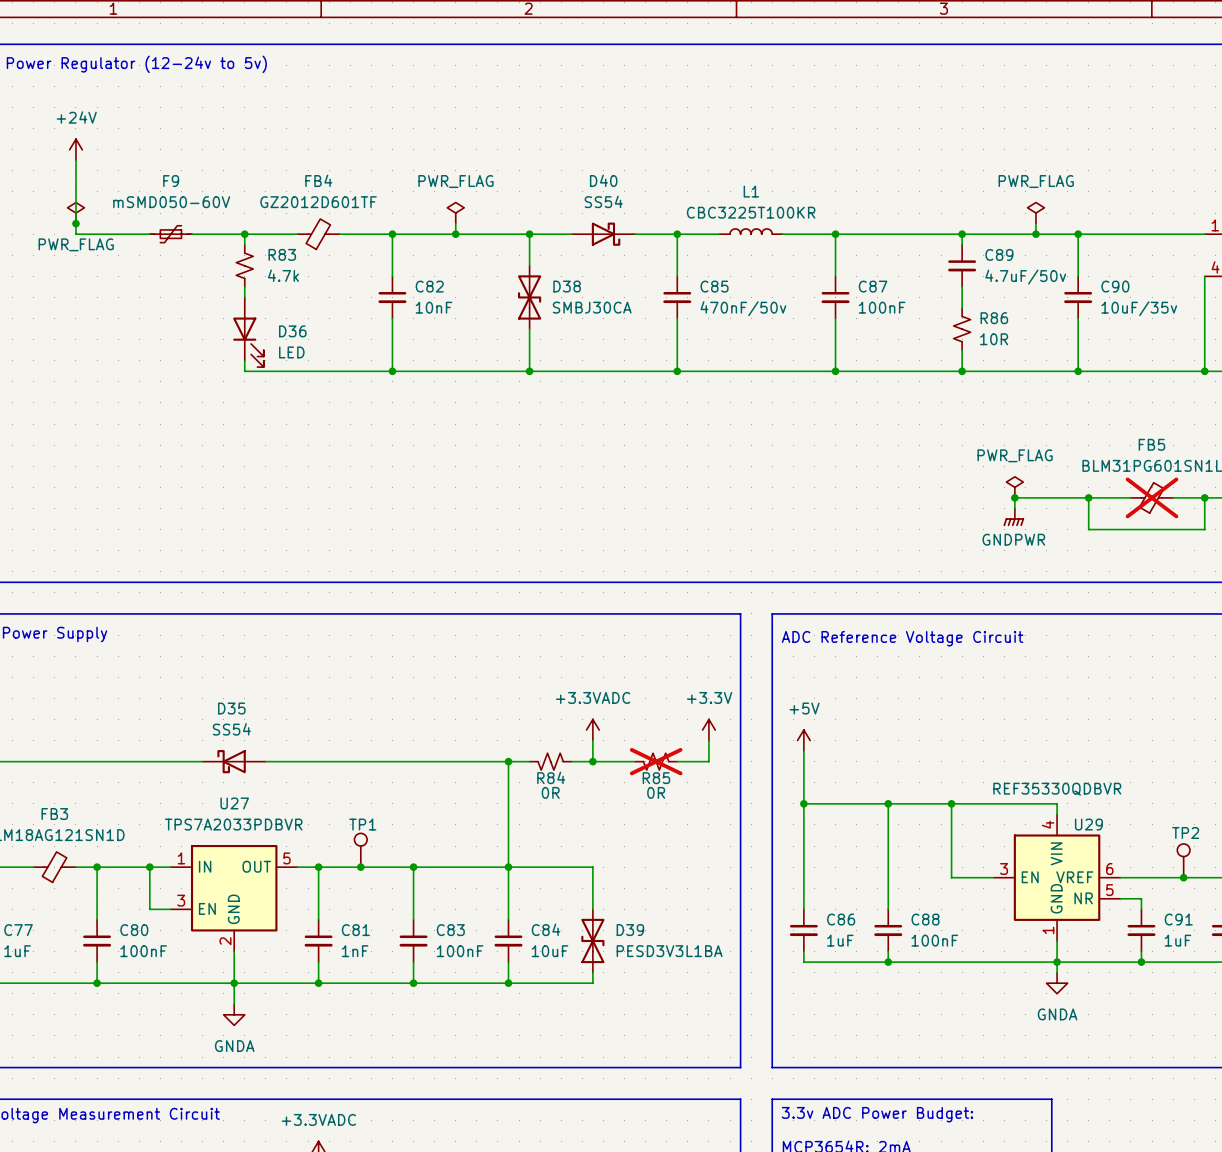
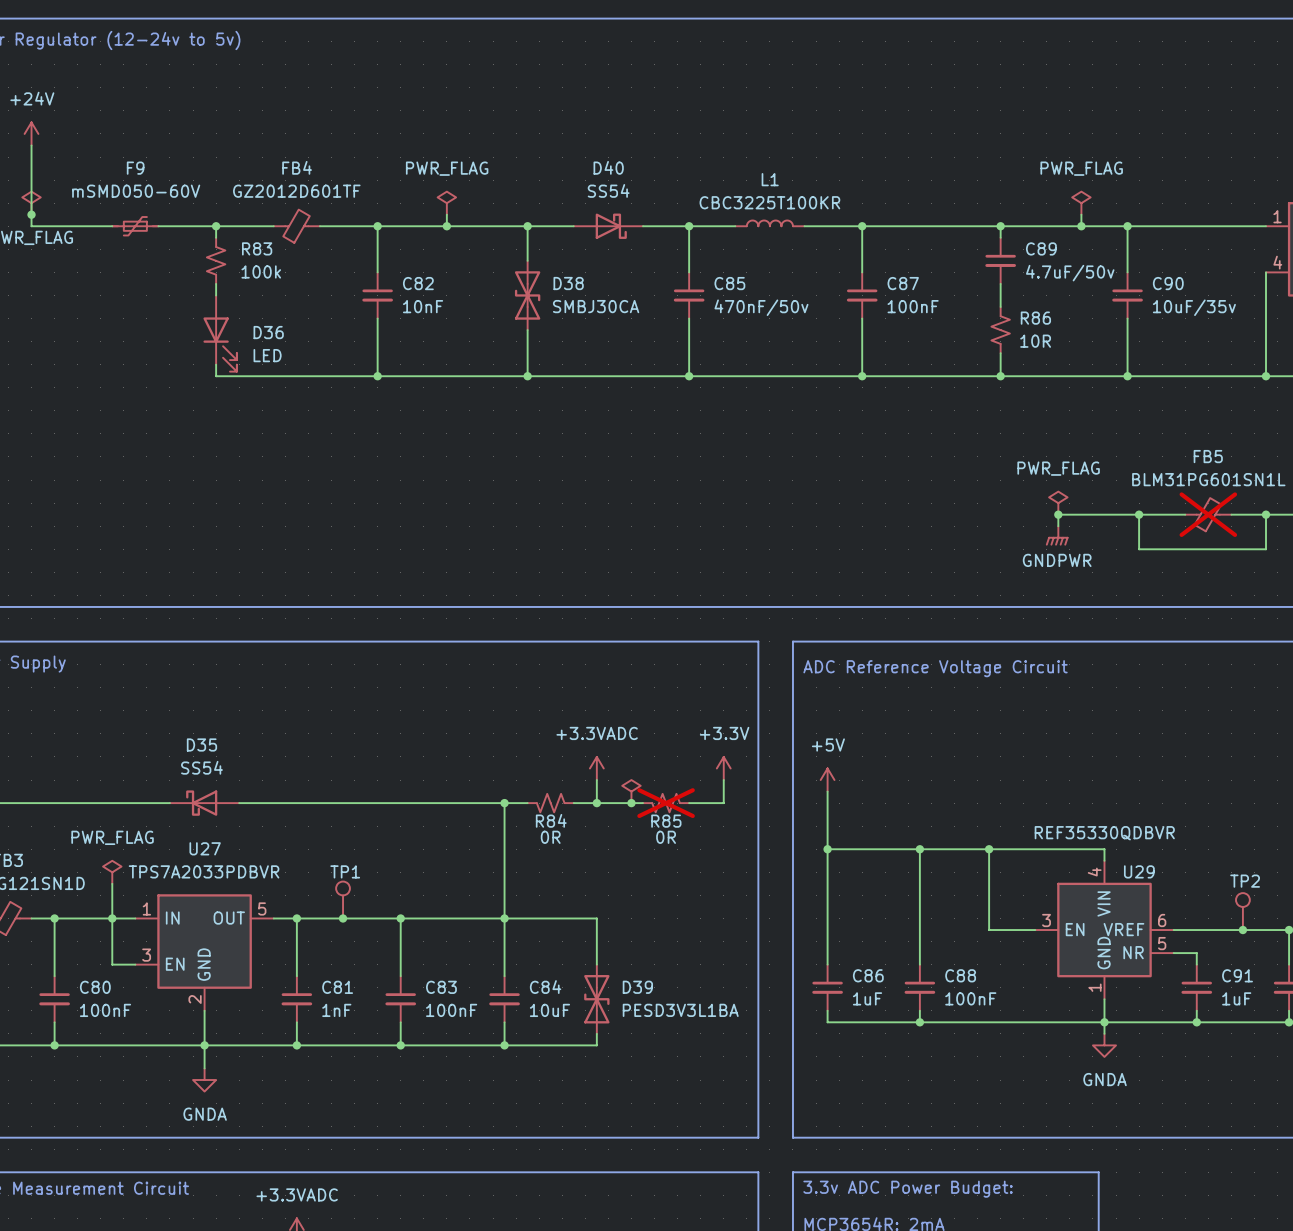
R83 value: 4.7k (283, 275) -> 100k (261, 271)
power symbol: none -> (631, 791)
junction: none -> (631, 803)
power symbol: none -> PWR_FLAG (112, 872)
wire: none -> (112, 883) (112, 918)

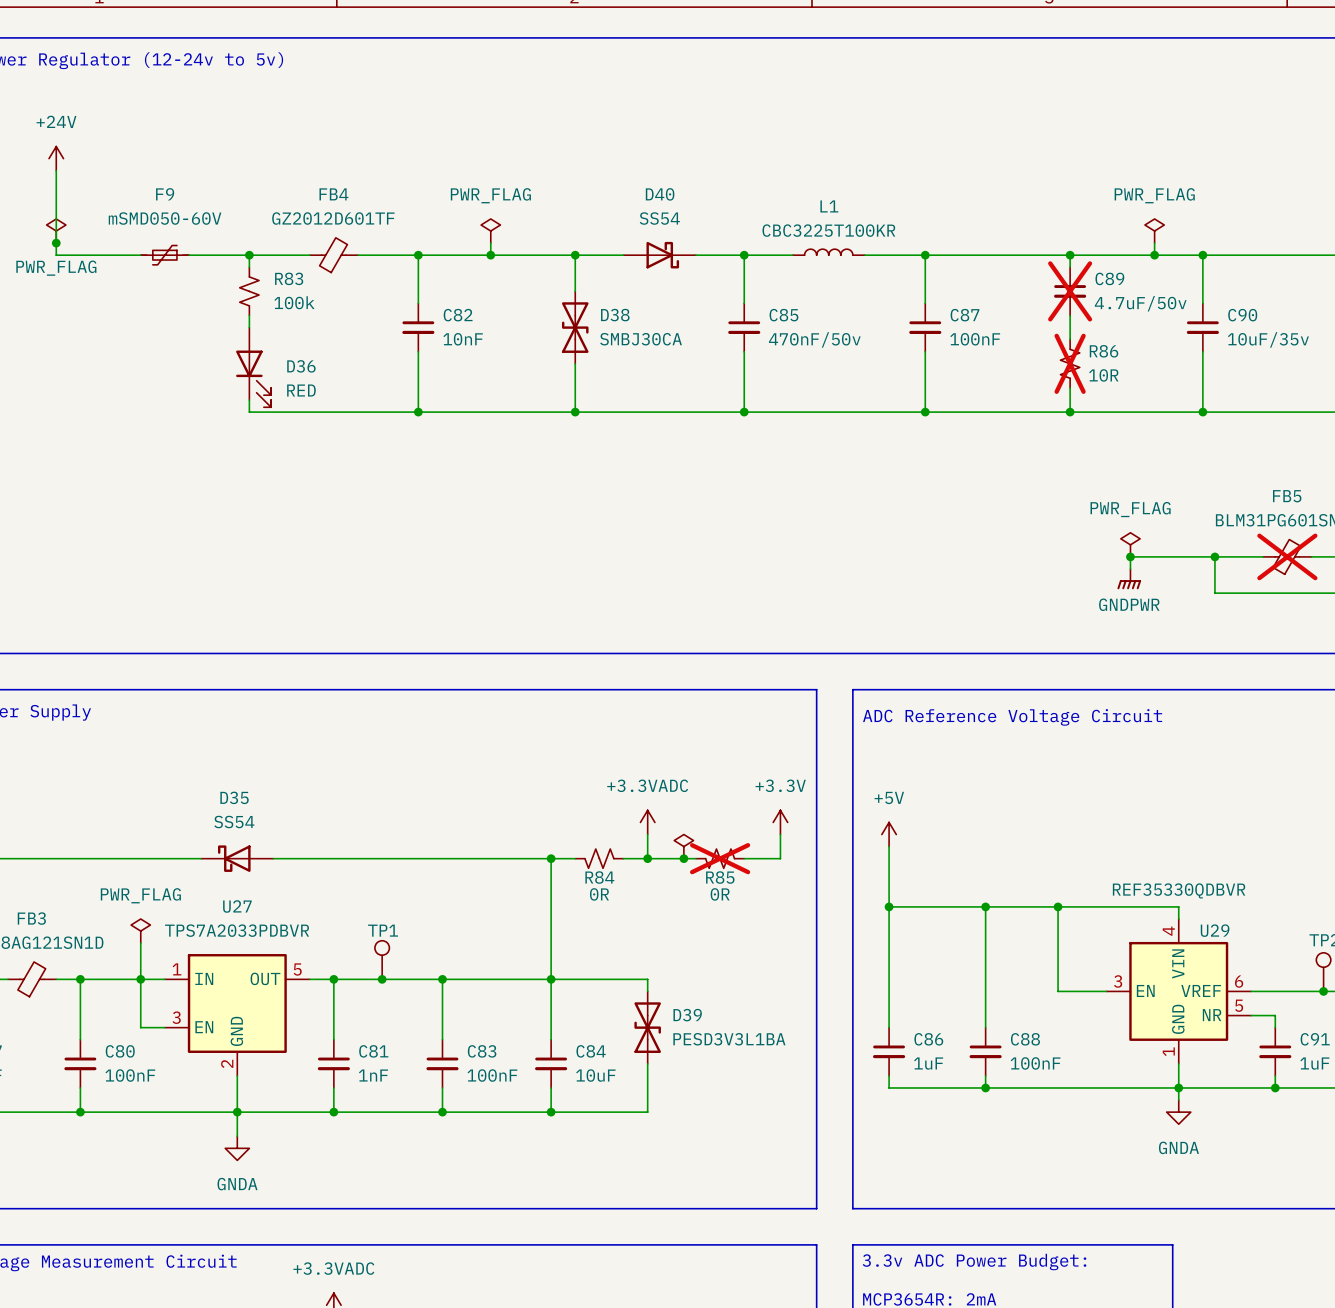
C89 do-not-place cross: none -> (1070, 291)
R86 do-not-place cross: none -> (1070, 363)
D36 value: LED (267, 355) -> RED (301, 390)
D39 position: (596, 999) -> (647, 1027)

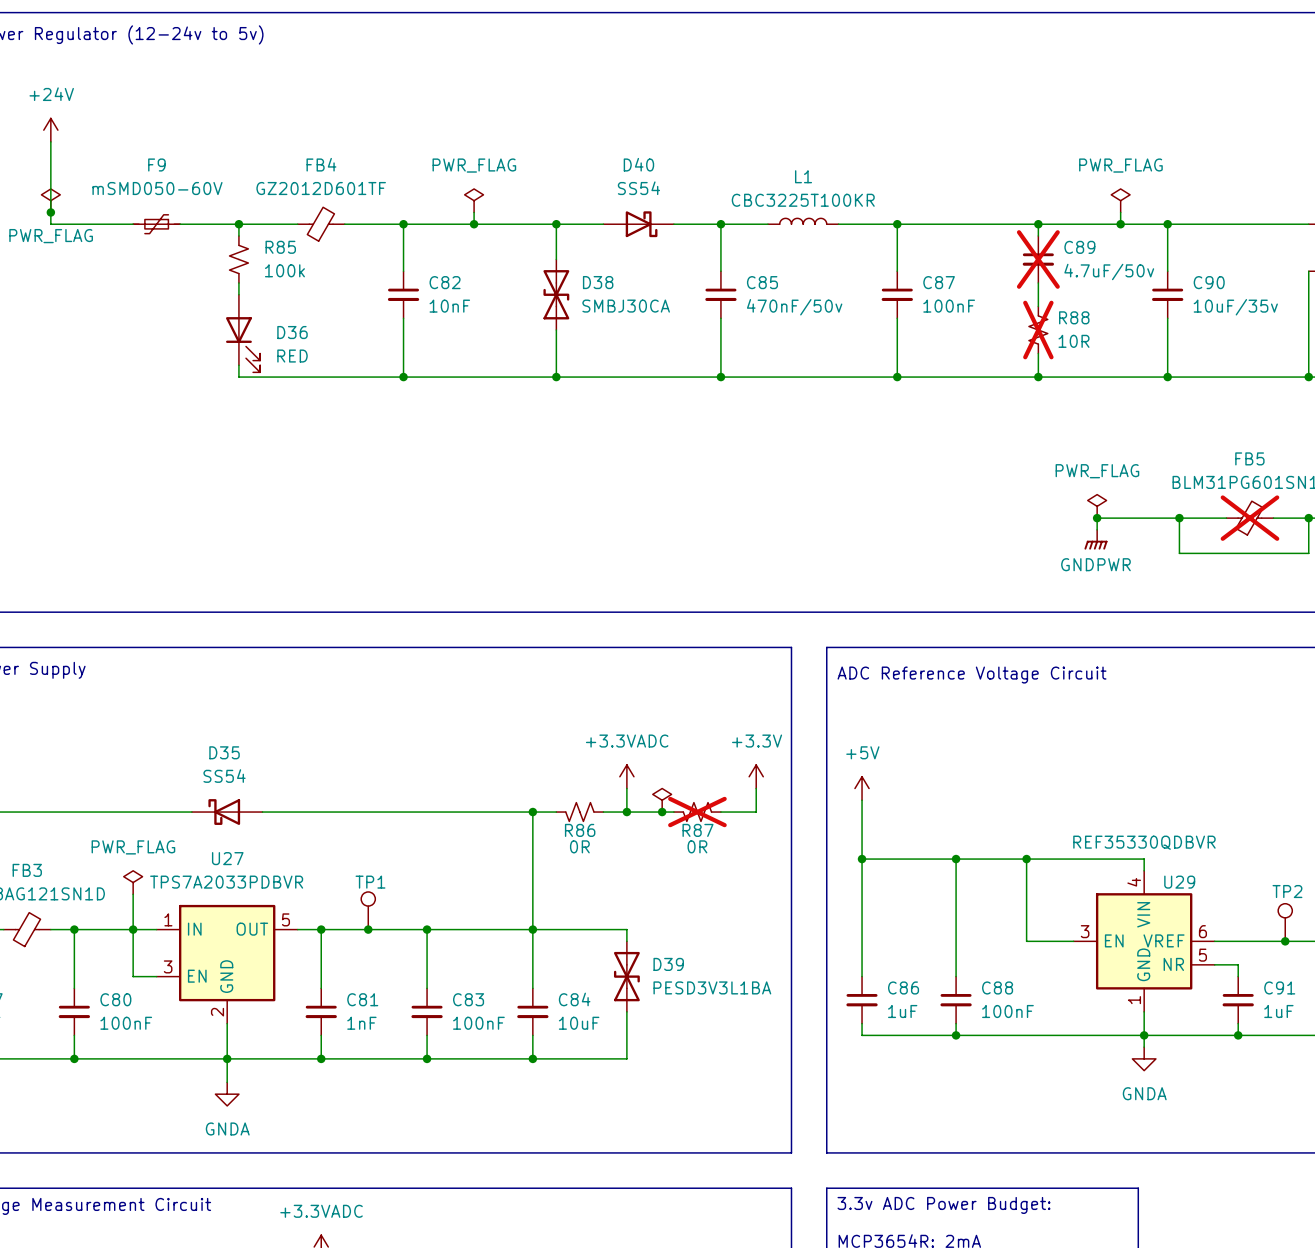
R83 name: R83 (289, 278) -> R85 (280, 247)
R86 name: R86 (1104, 351) -> R88 (1074, 317)
R84 name: R84 (599, 877) -> R86 (580, 830)
R85 name: R85 (720, 877) -> R87 (697, 830)

